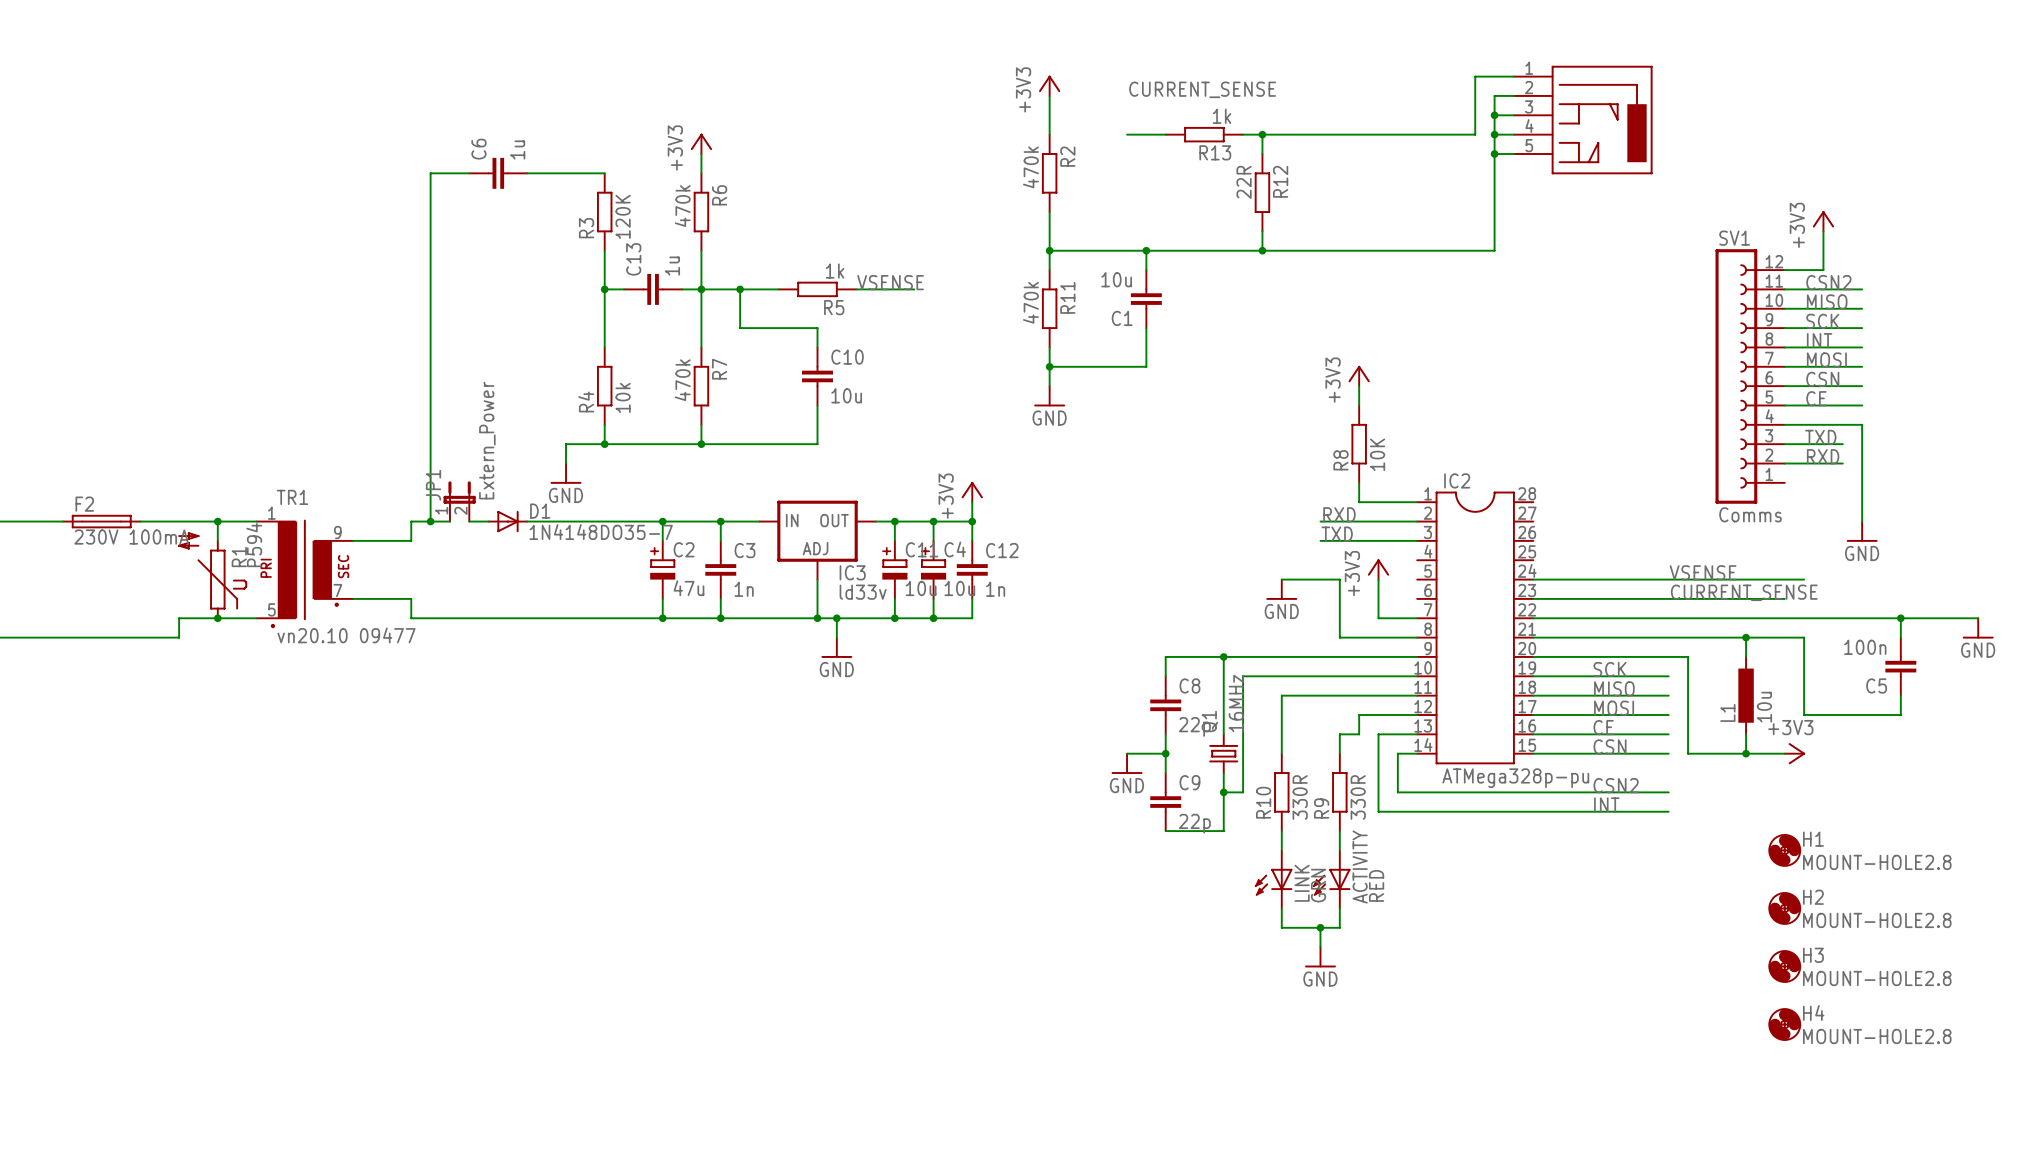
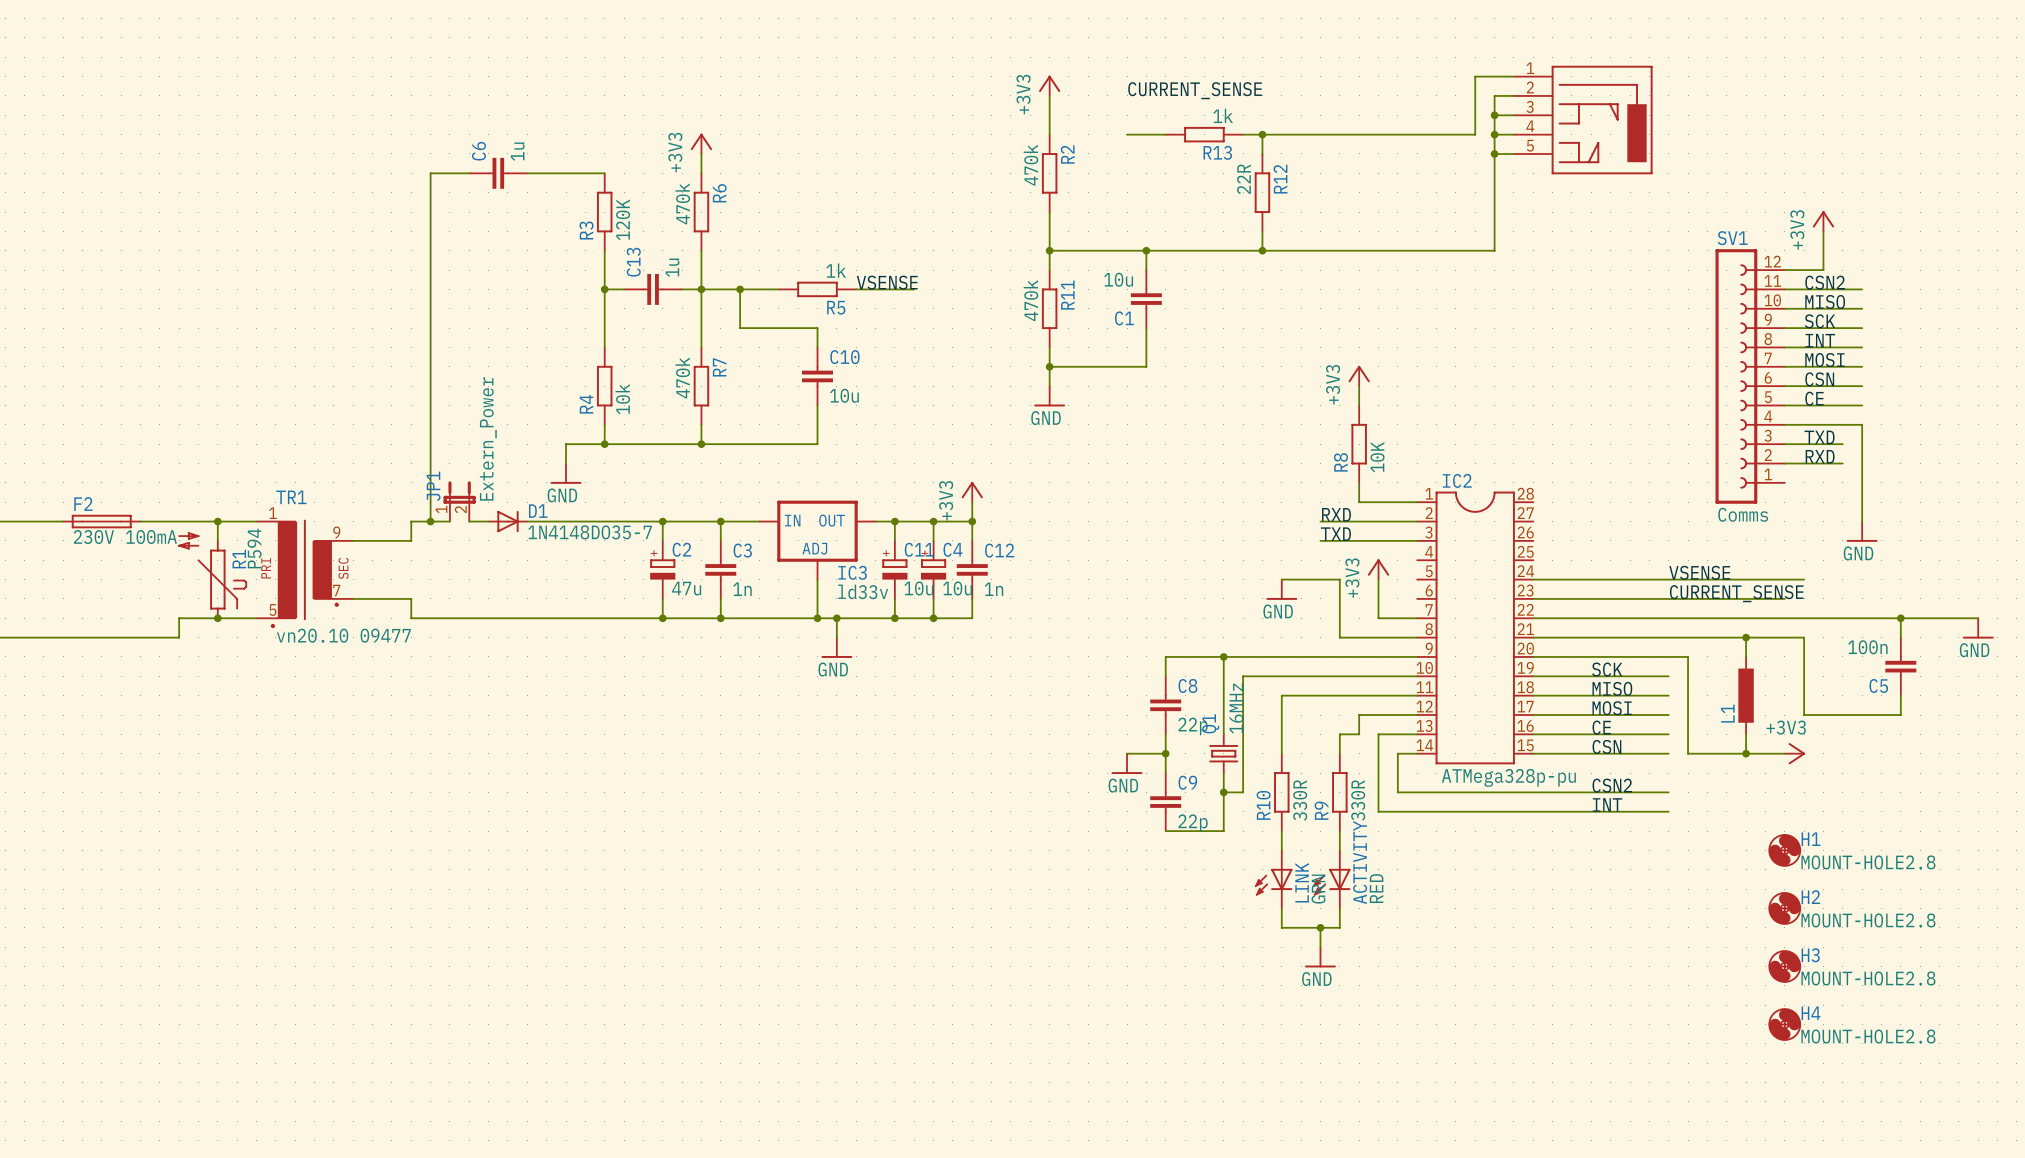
L1 value: 10u (1764, 707) -> none

